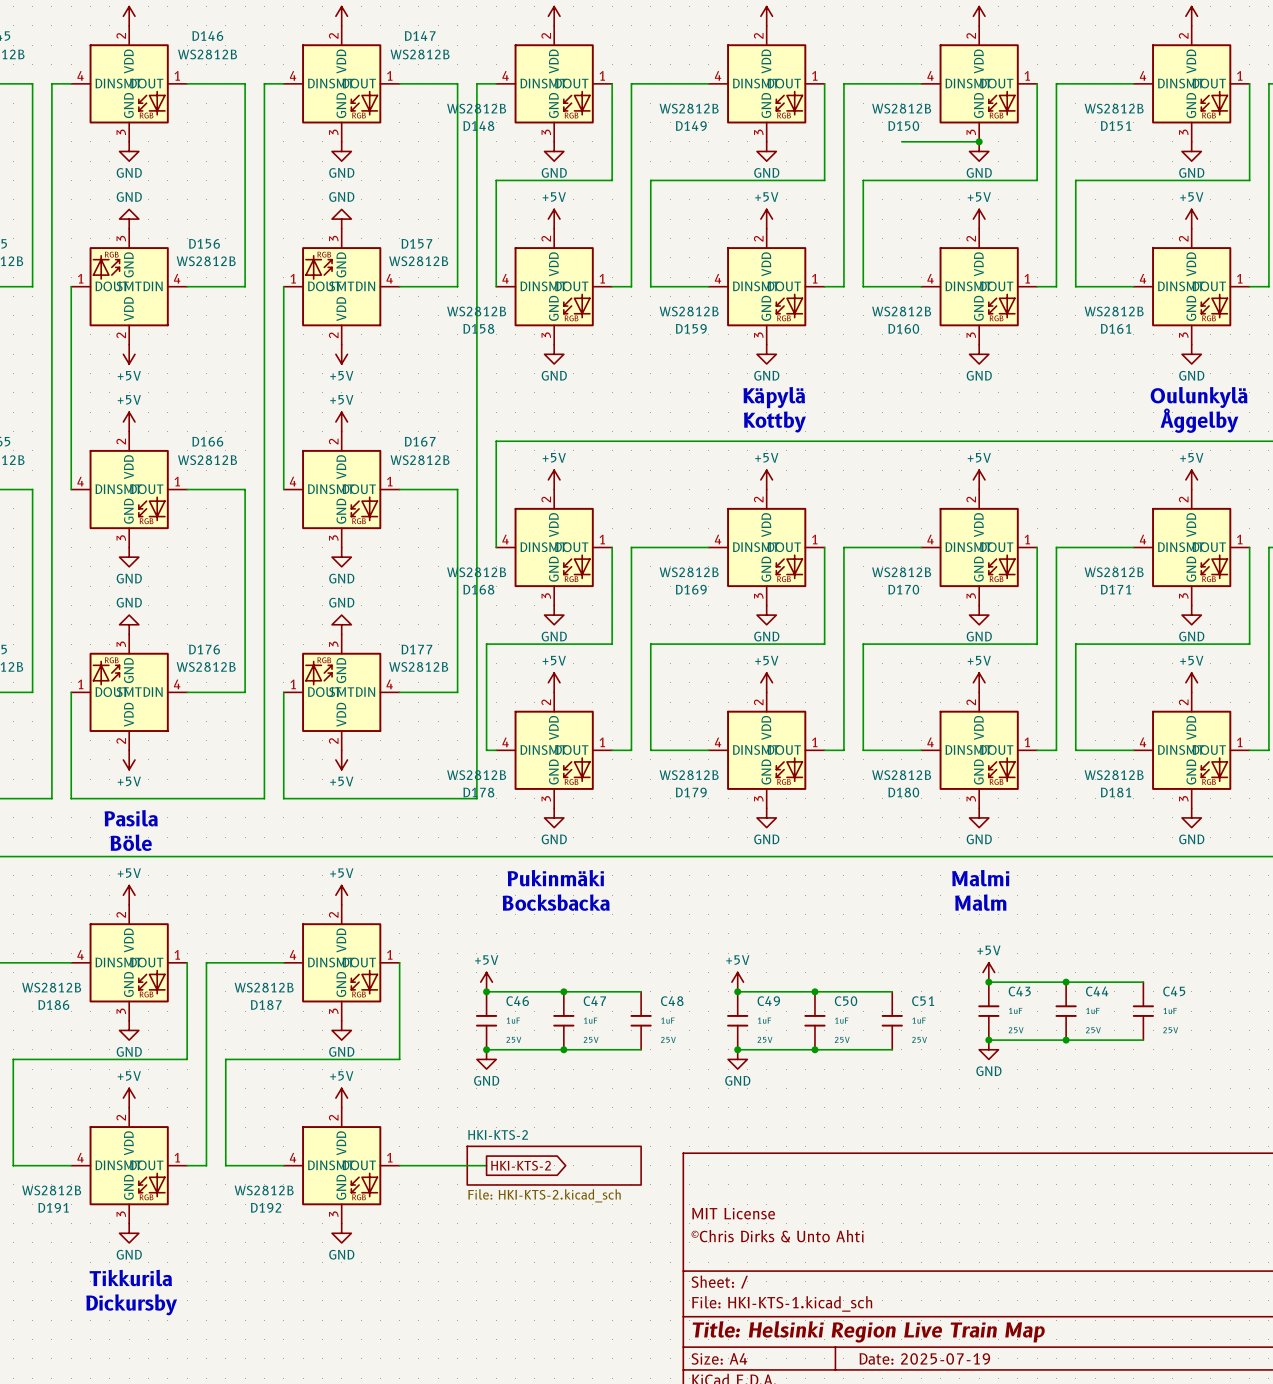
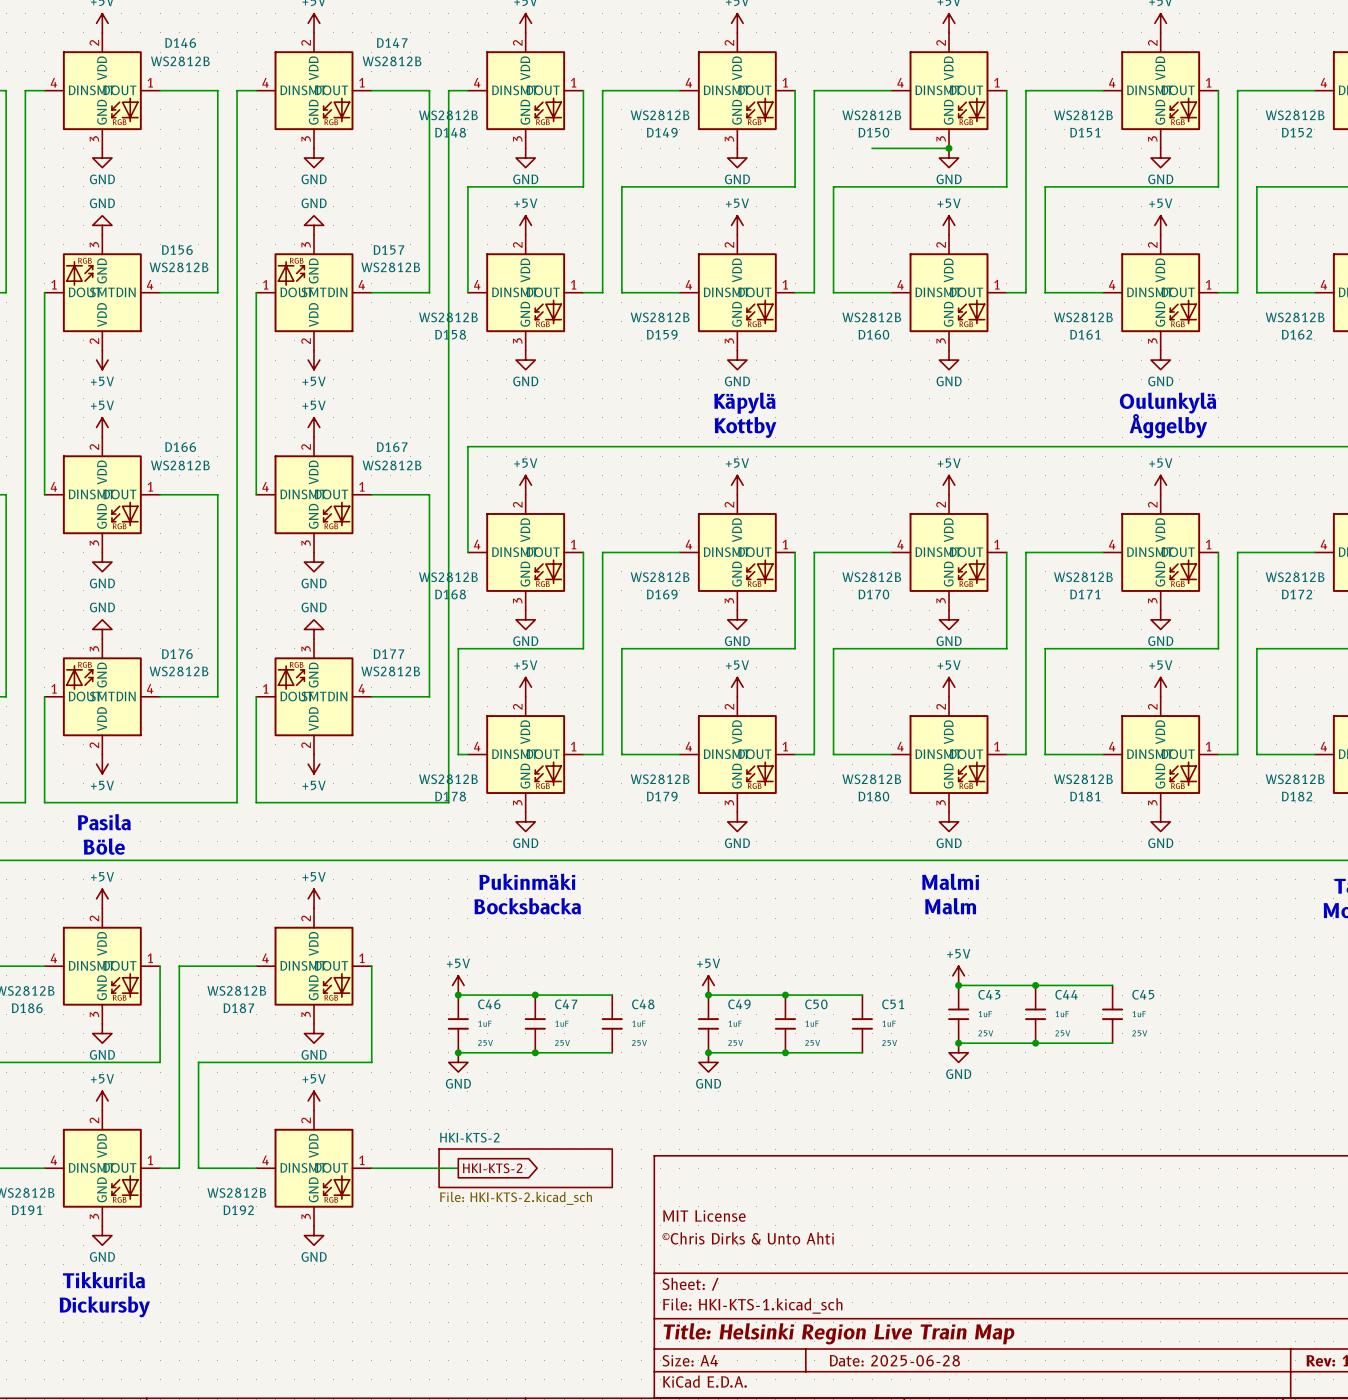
title block: Date: 2025-07-19 (924, 1358) -> Date: 2025-06-28 (894, 1360)

